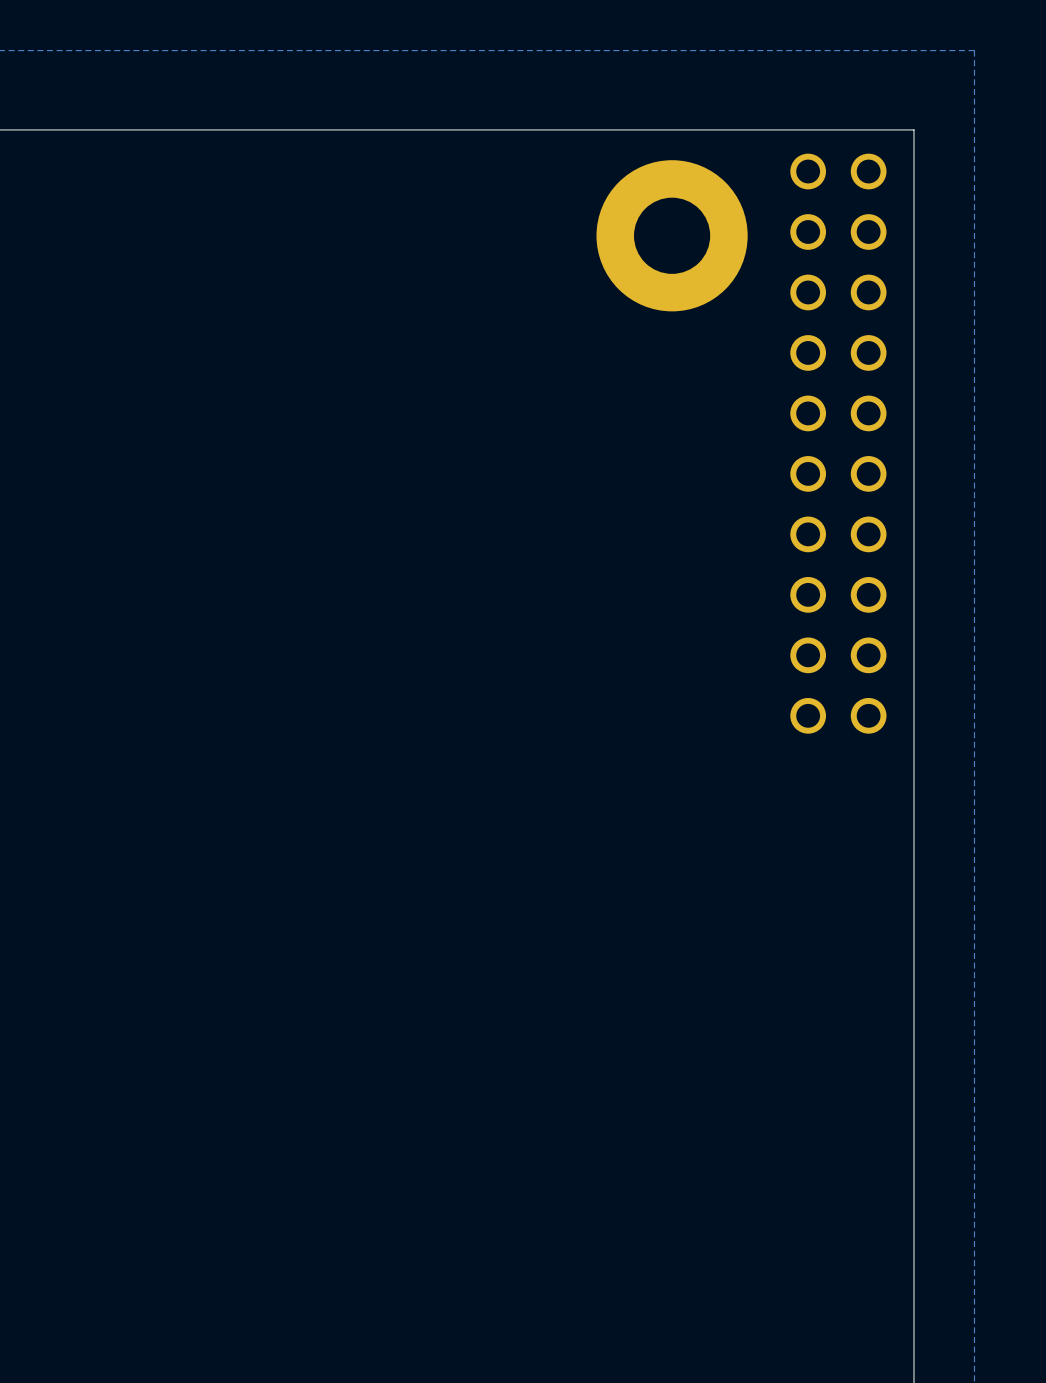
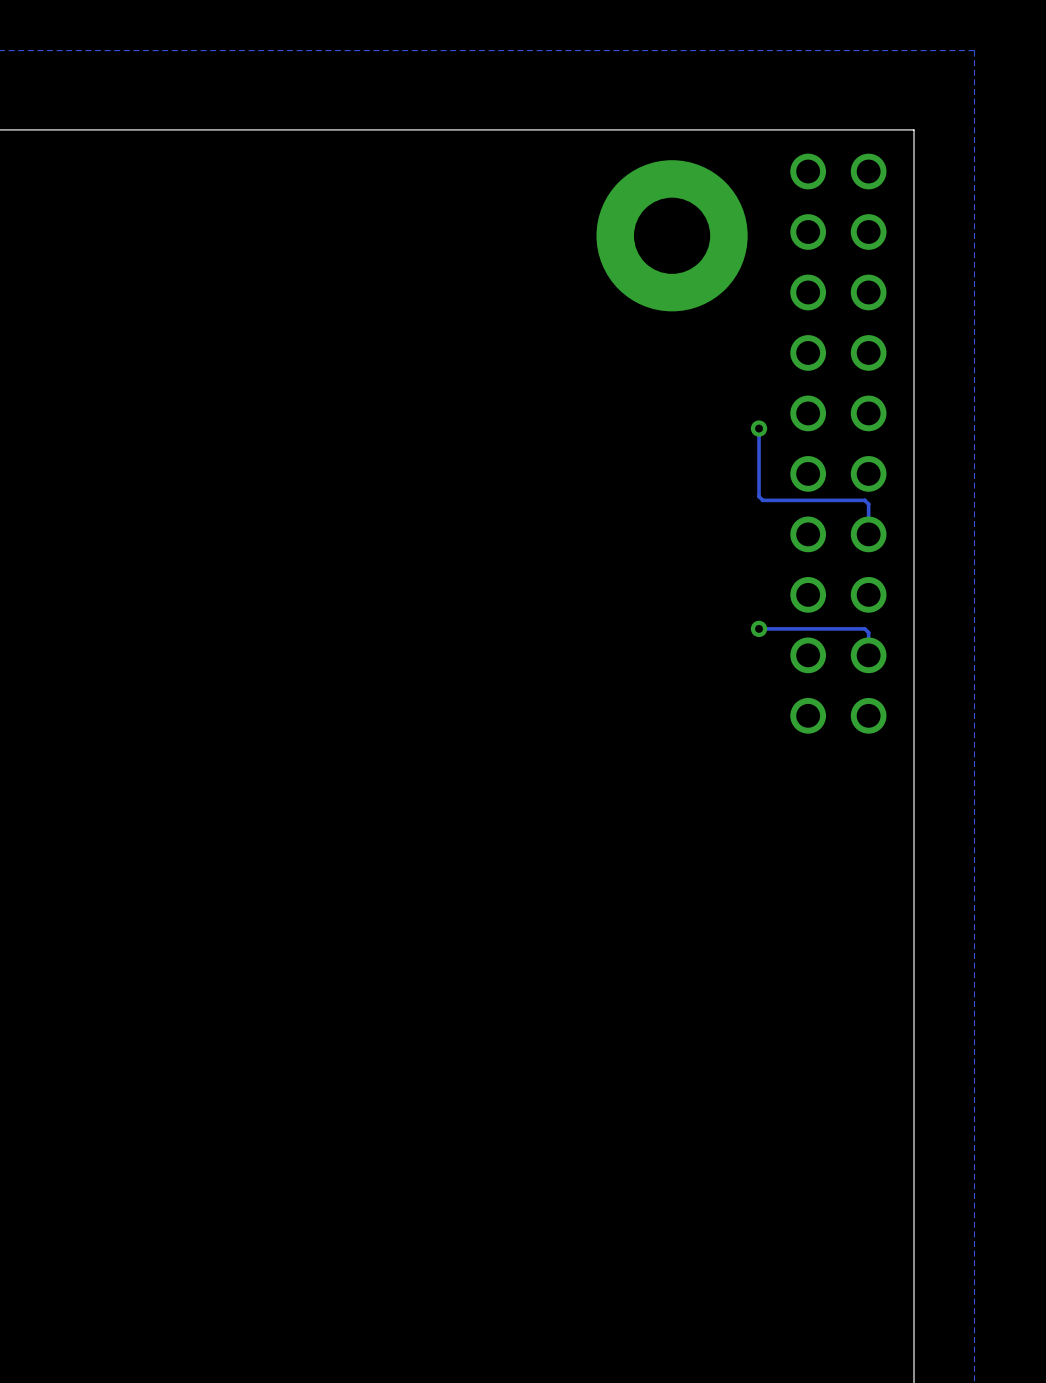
track: none -> (759, 428) (759, 496) (762, 500) (864, 500) (868, 504) (868, 534)
via: none -> (759, 428)
track: none -> (759, 628) (864, 628) (868, 632) (868, 655)
via: none -> (759, 628)

